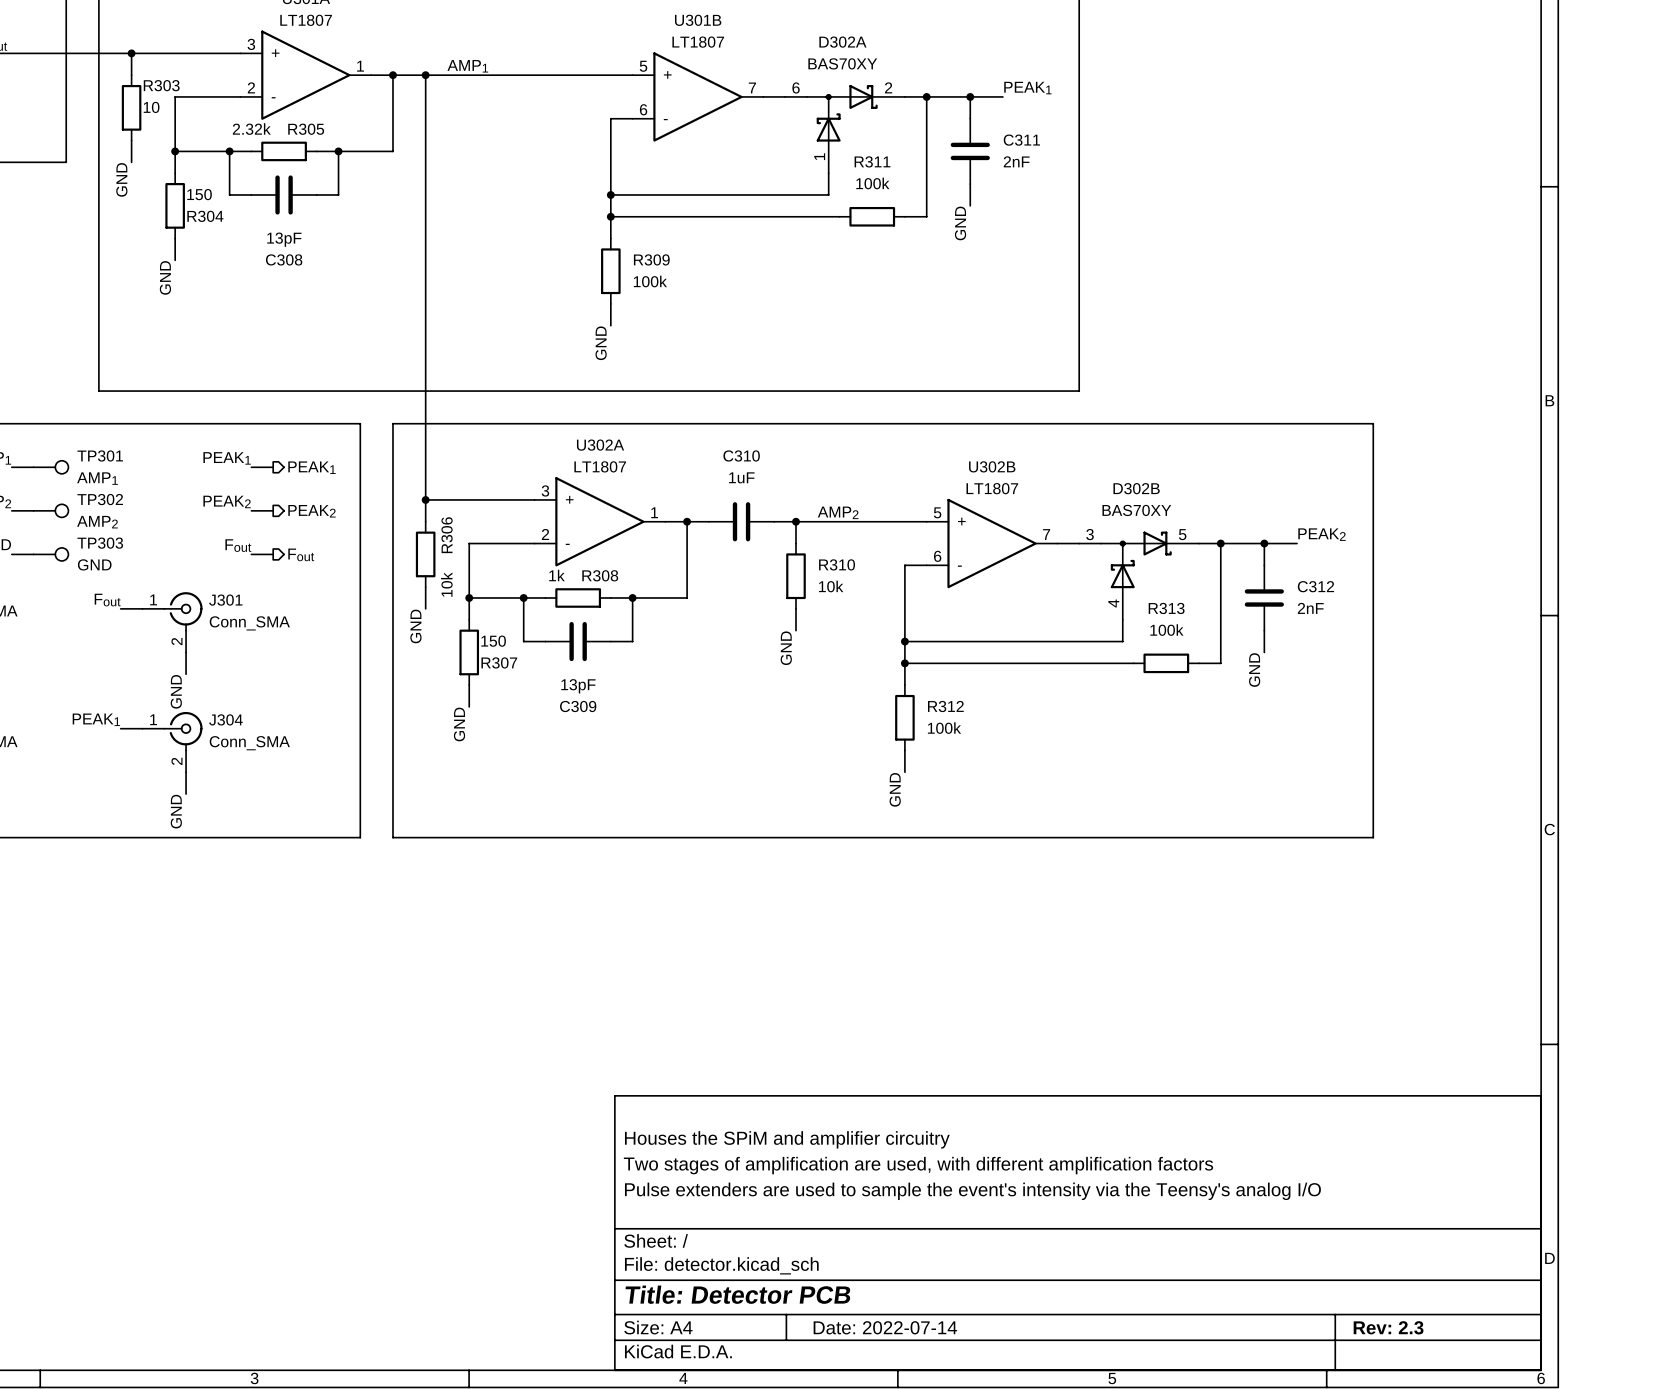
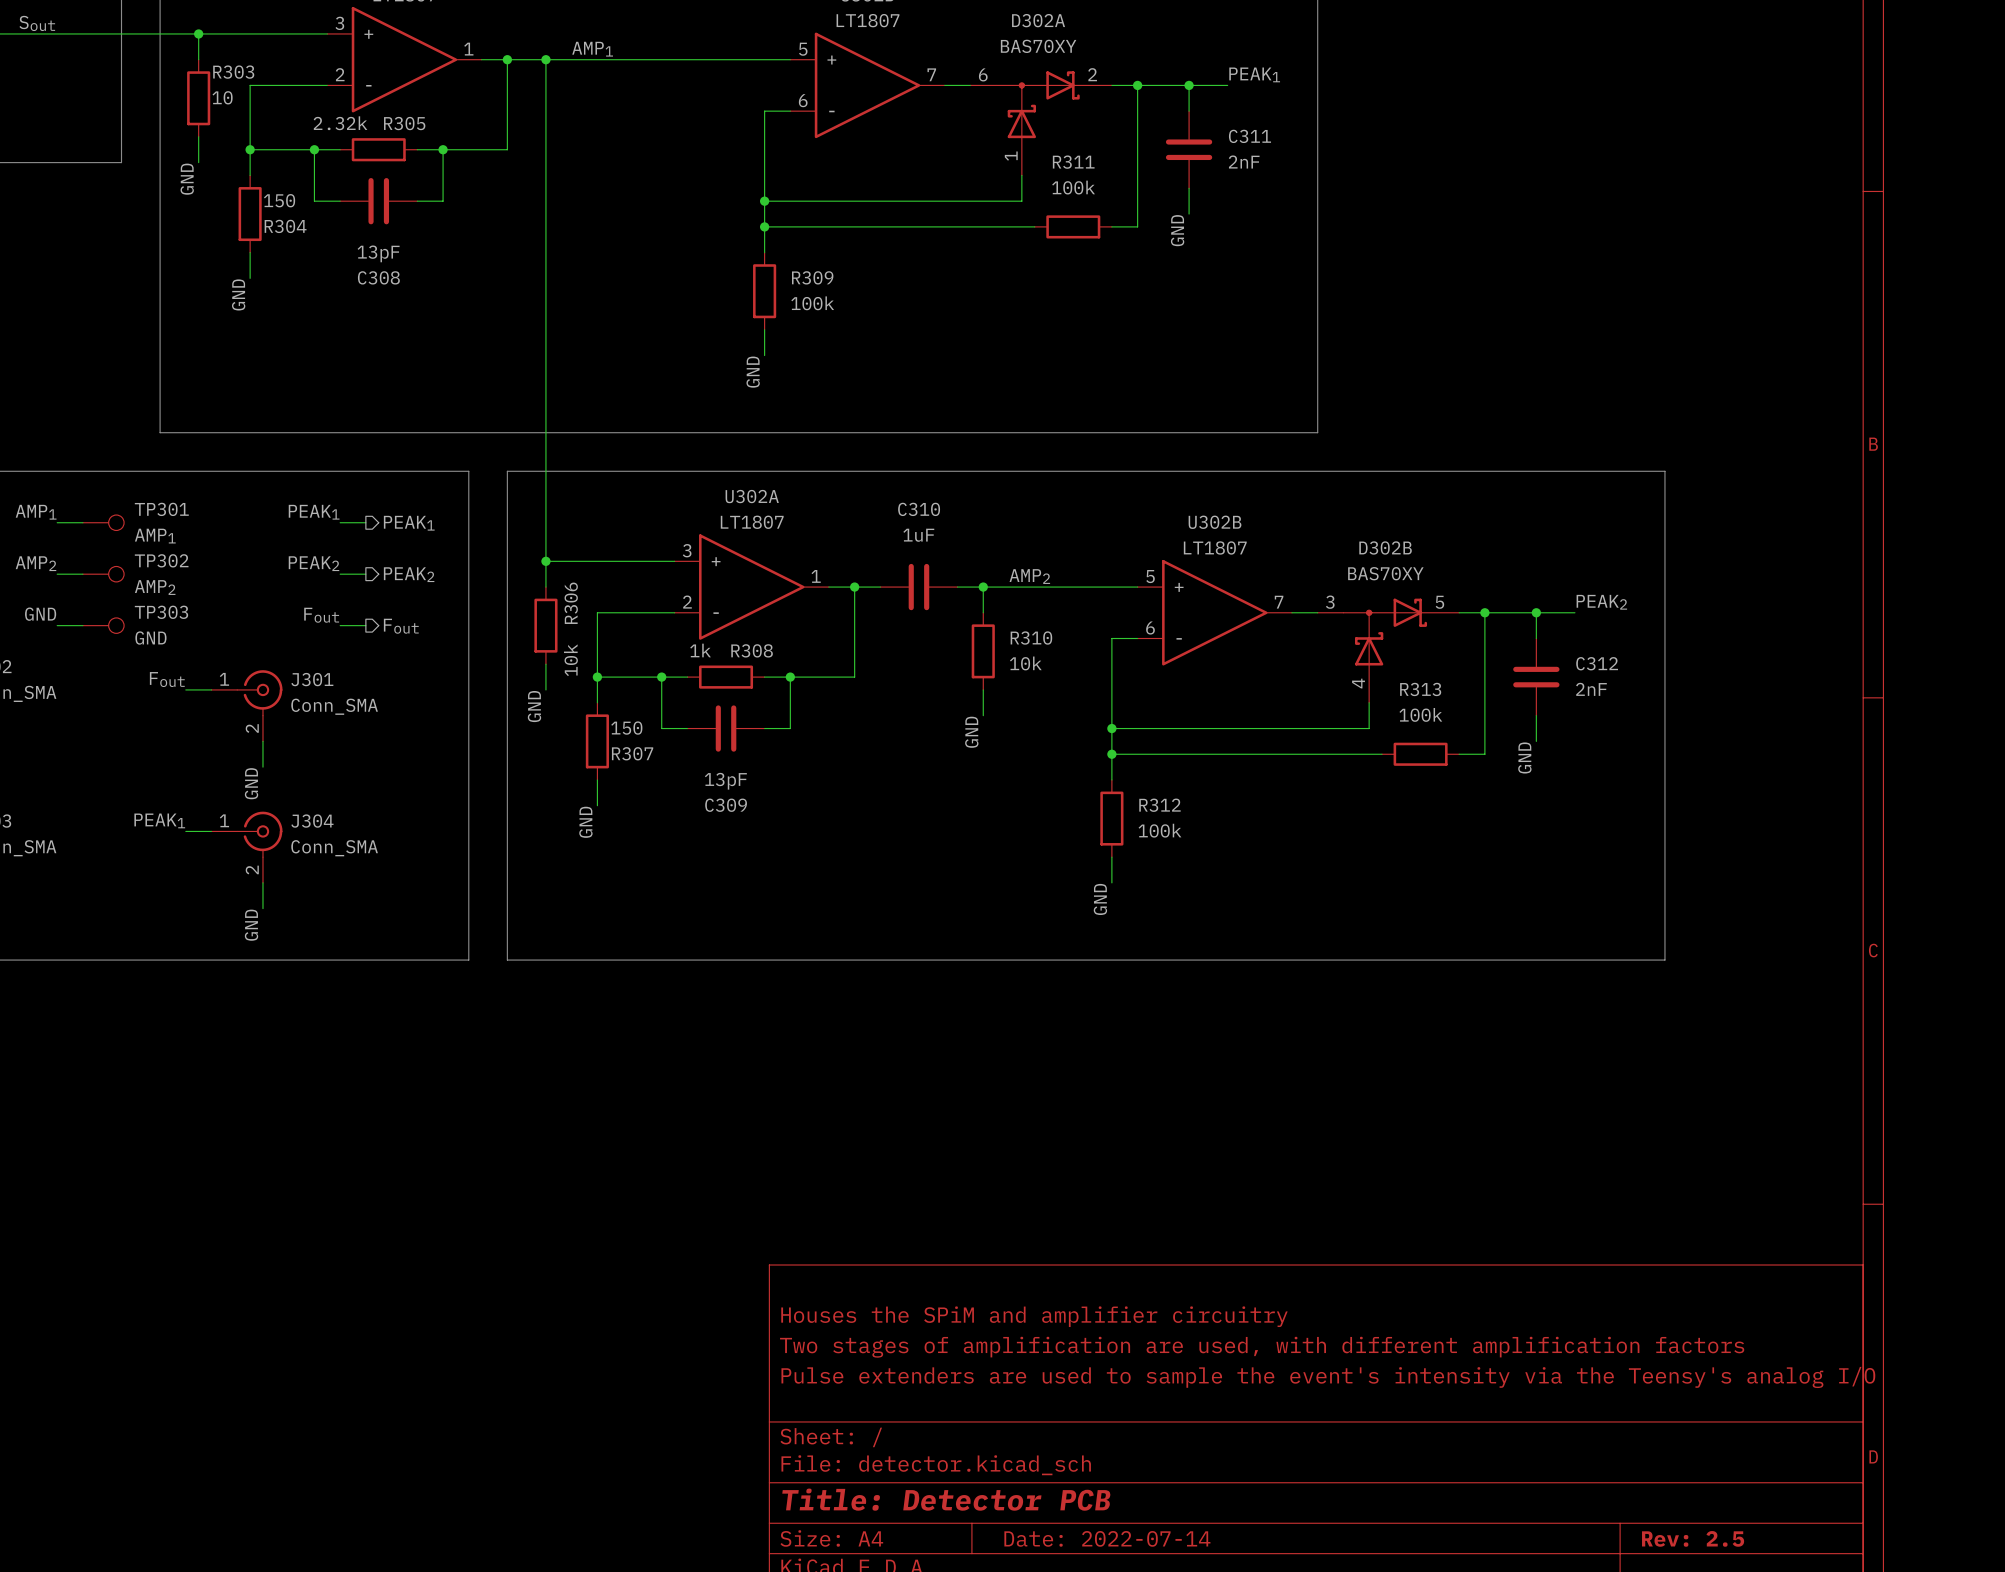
title block: Rev: 2.3 (1388, 1327) -> Rev: 2.5 (1693, 1538)

